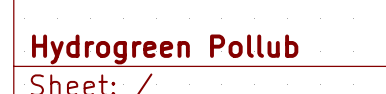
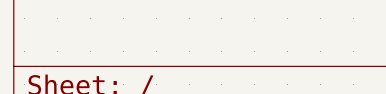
title block: Hydrogreen Pollub (165, 49) -> none

